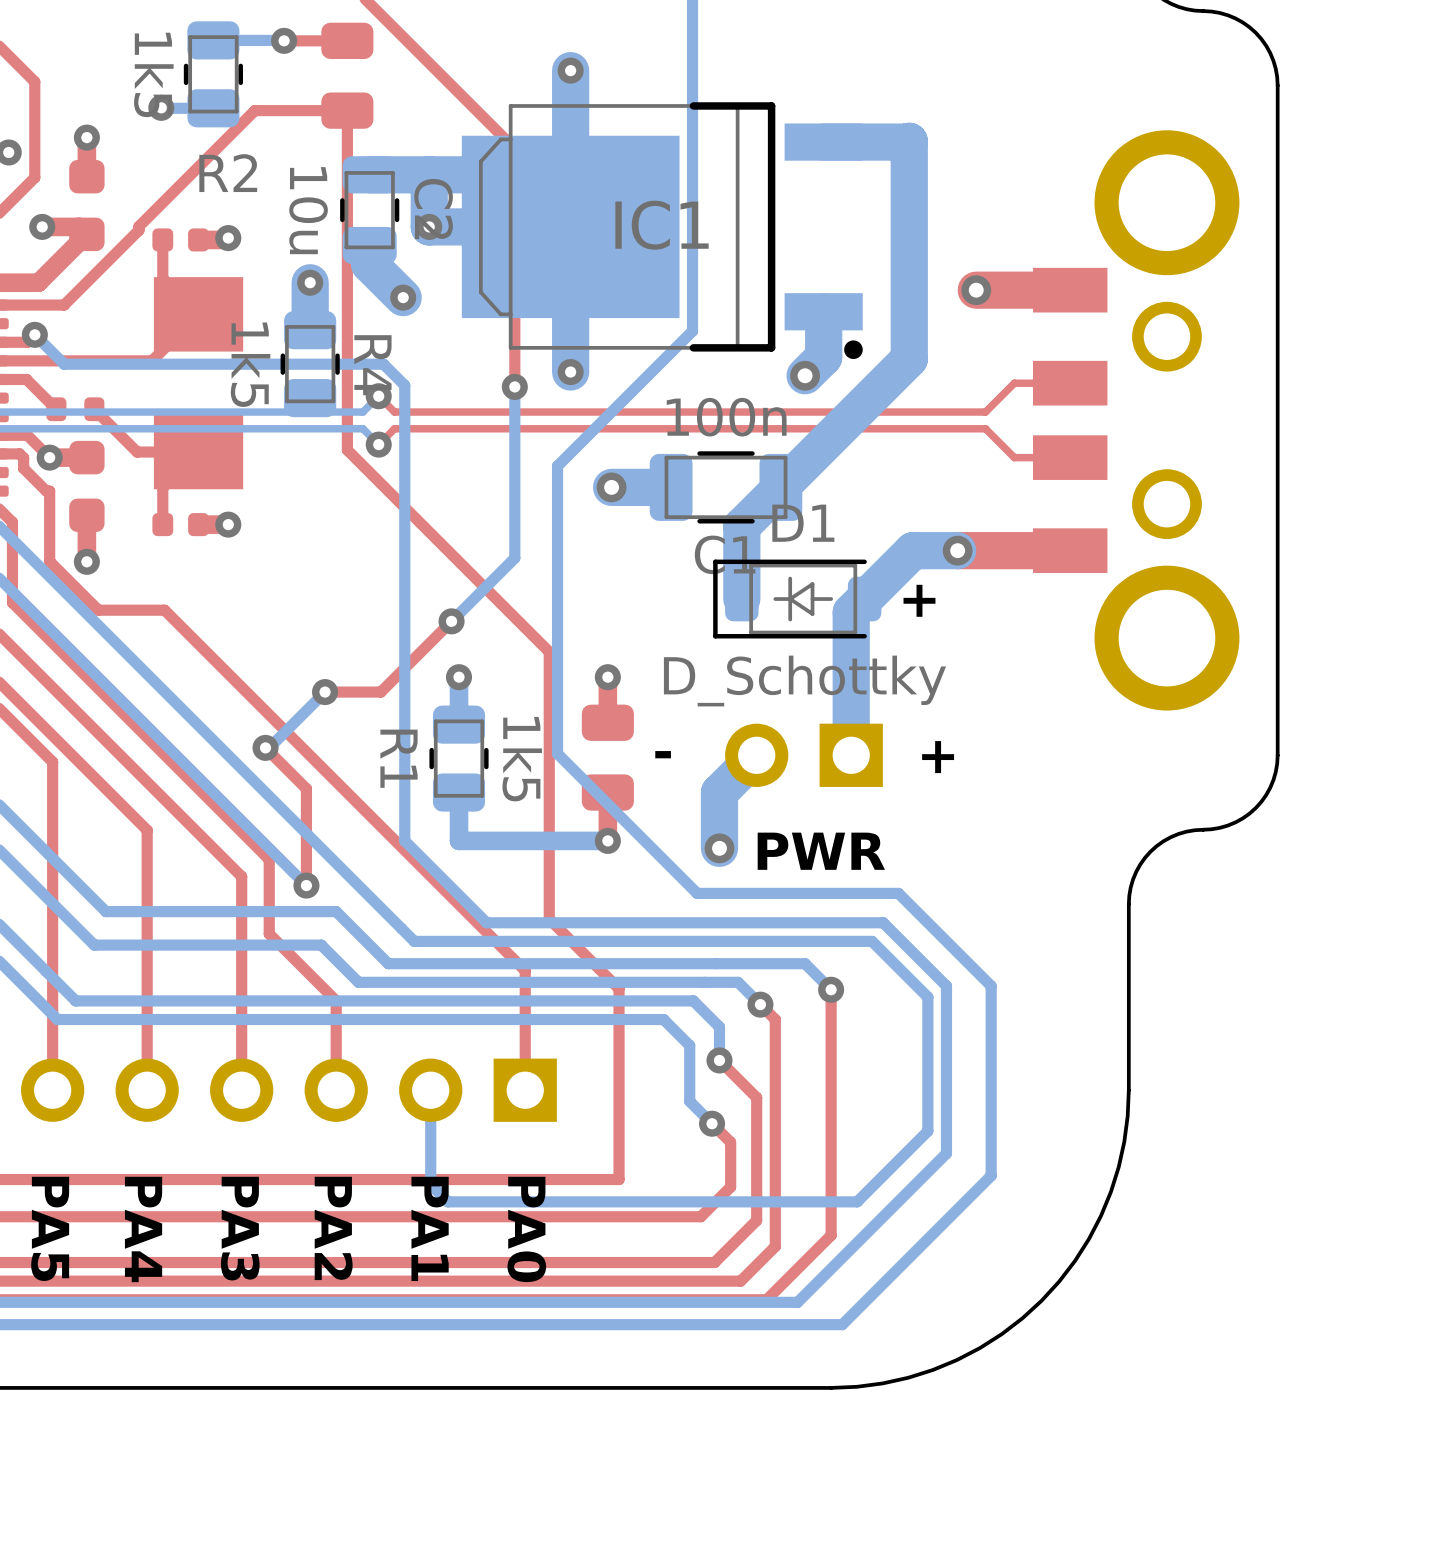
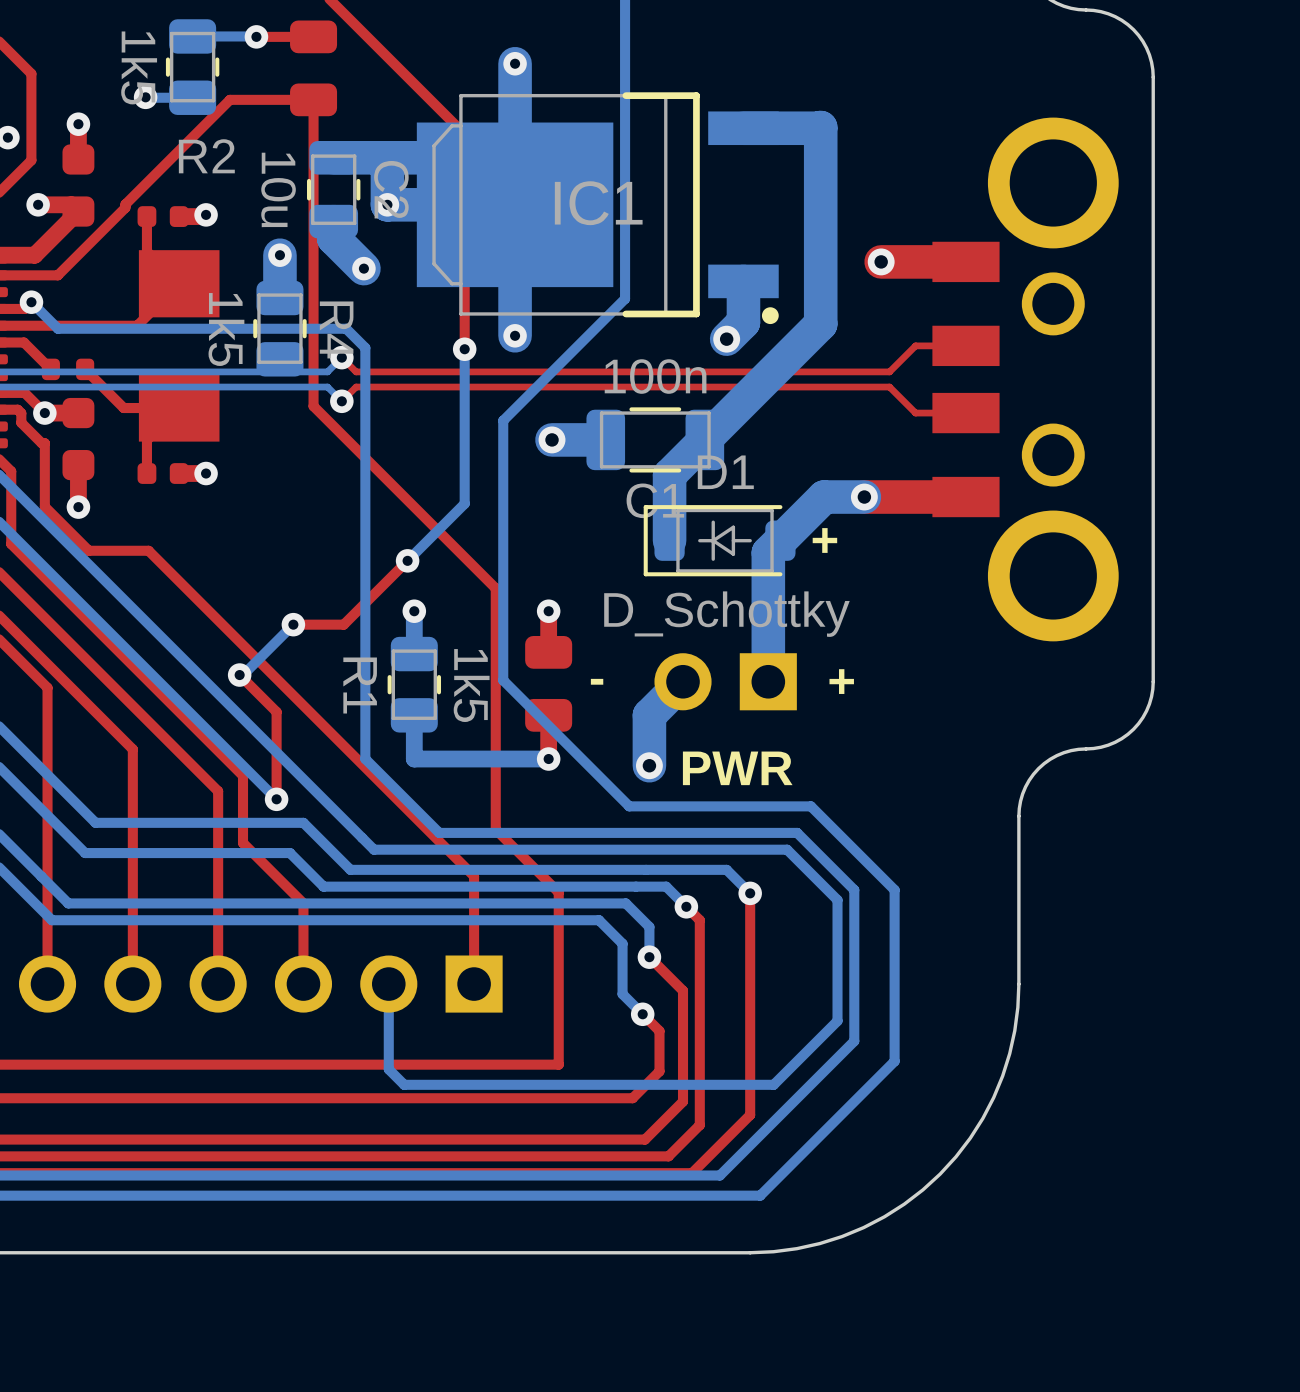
text: PA5 (50, 1228) -> none
text: PA3 (240, 1228) -> none
text: PA2 (333, 1228) -> none
text: PA1 (430, 1228) -> none
text: PA4 (143, 1229) -> none
text: PA0 (526, 1229) -> none

